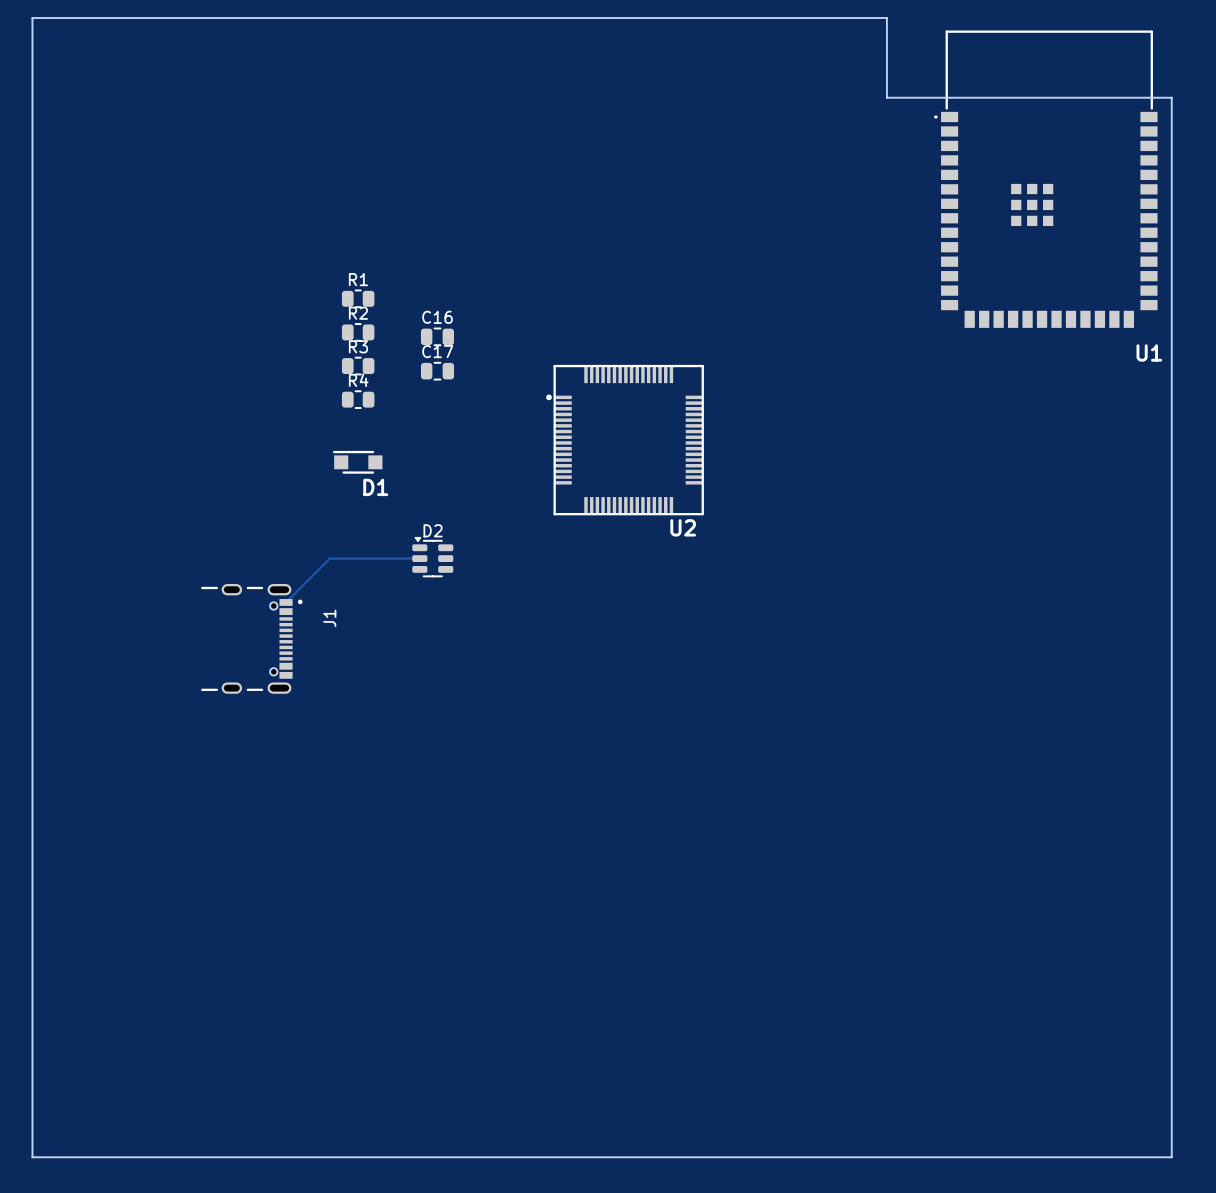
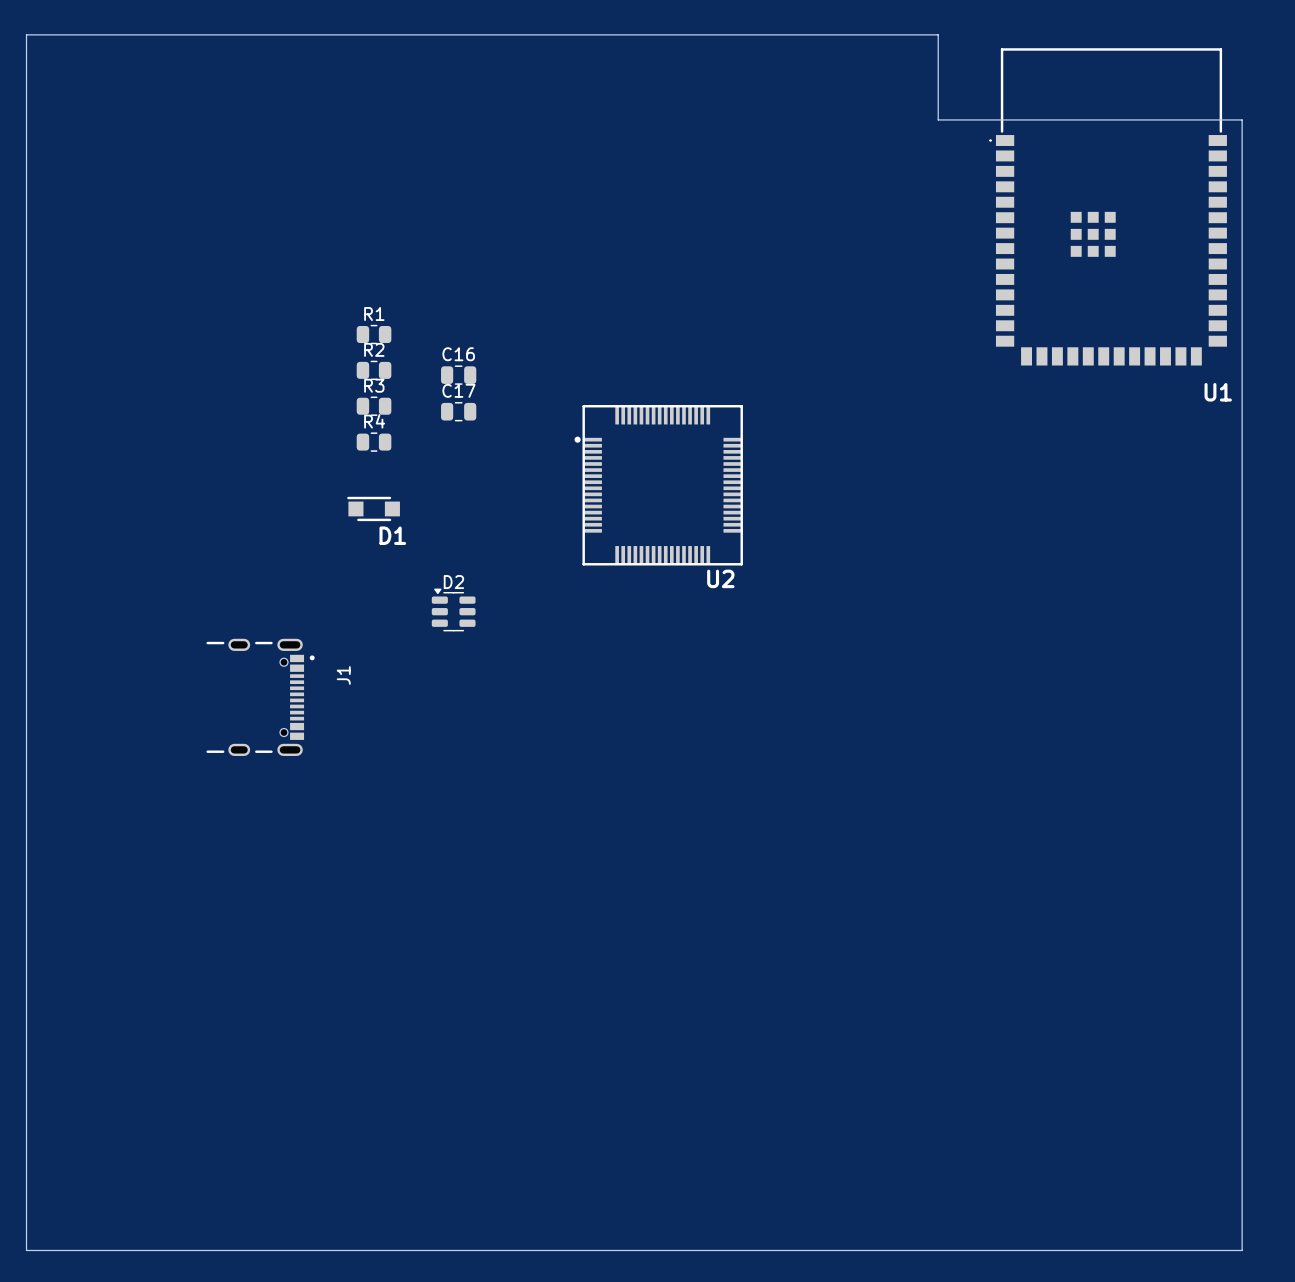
track: (419, 558) (329, 558) (286, 602) -> none

